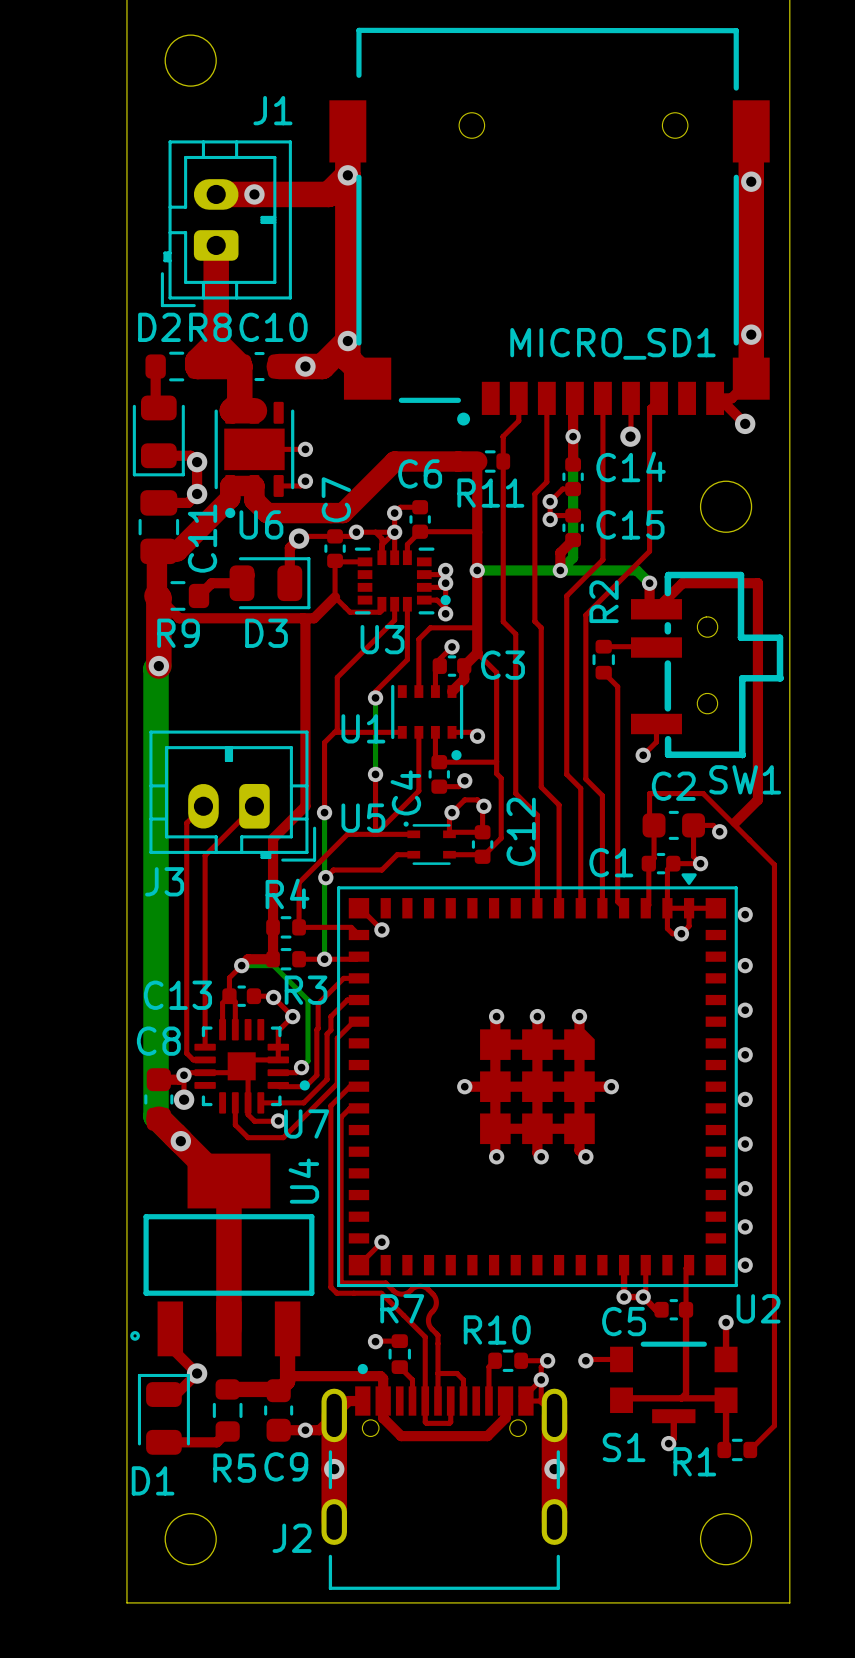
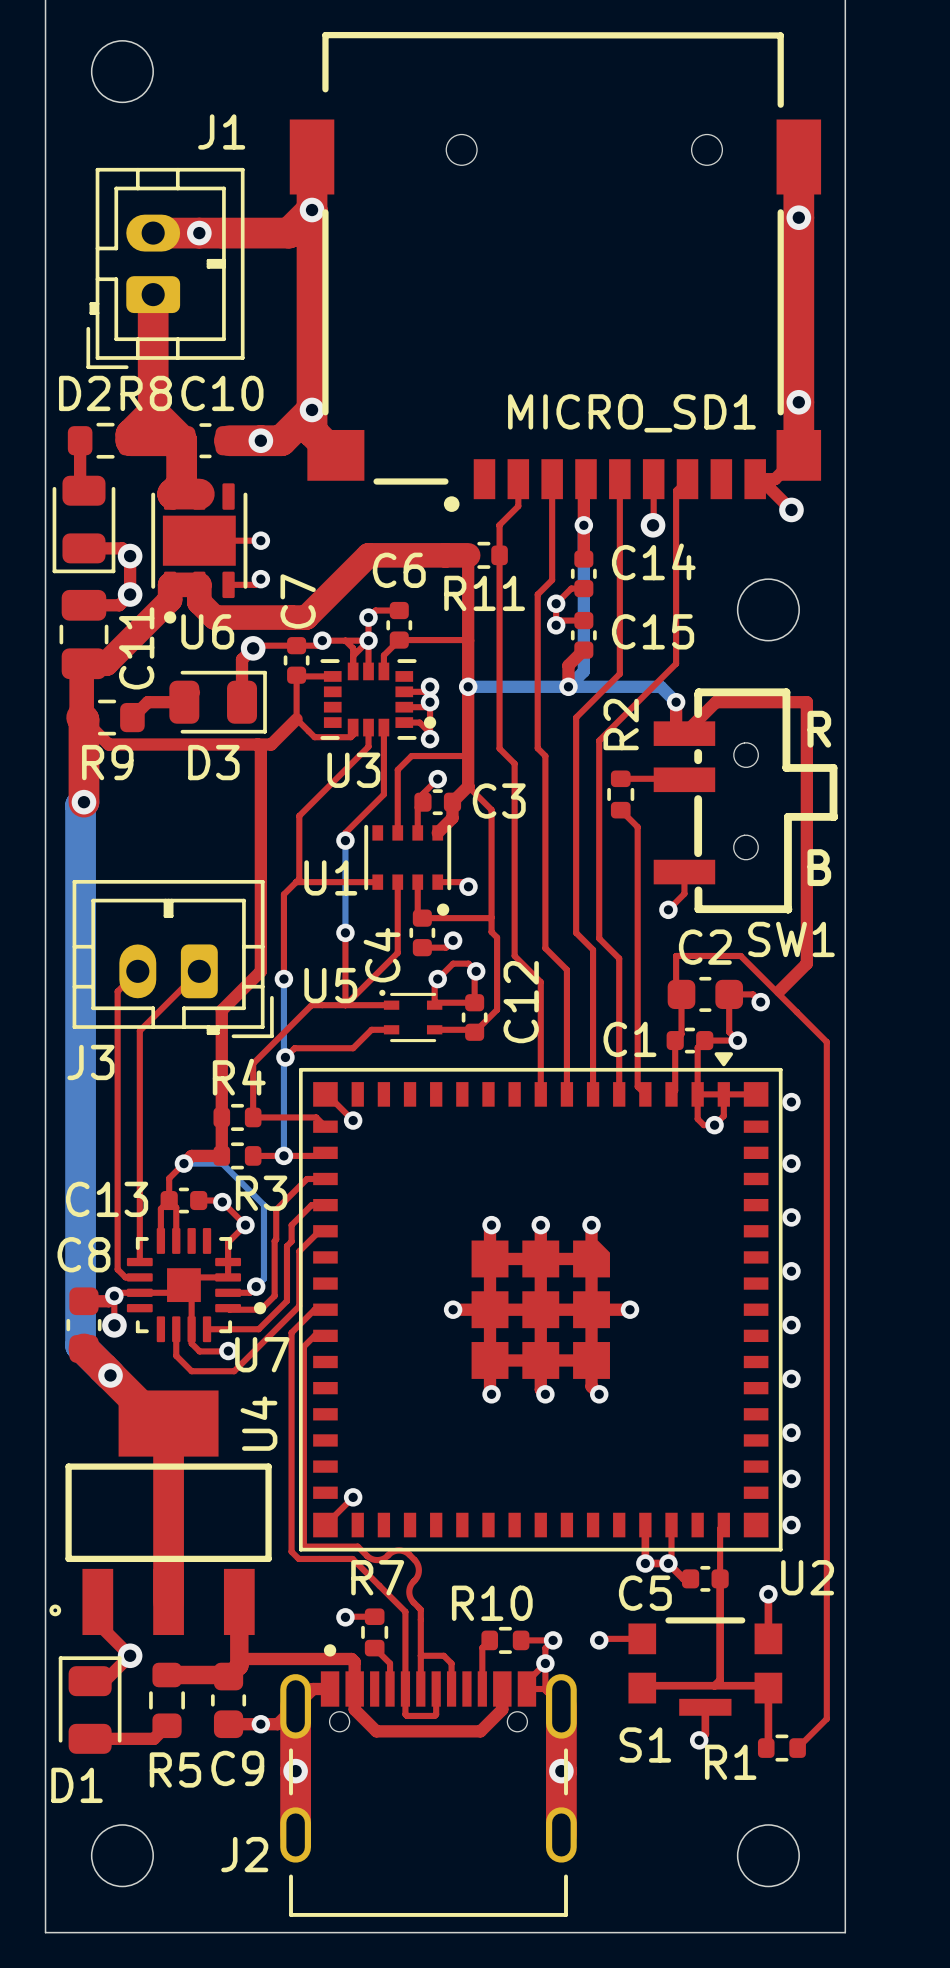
text: none -> R (819, 729)
text: none -> B (819, 867)

